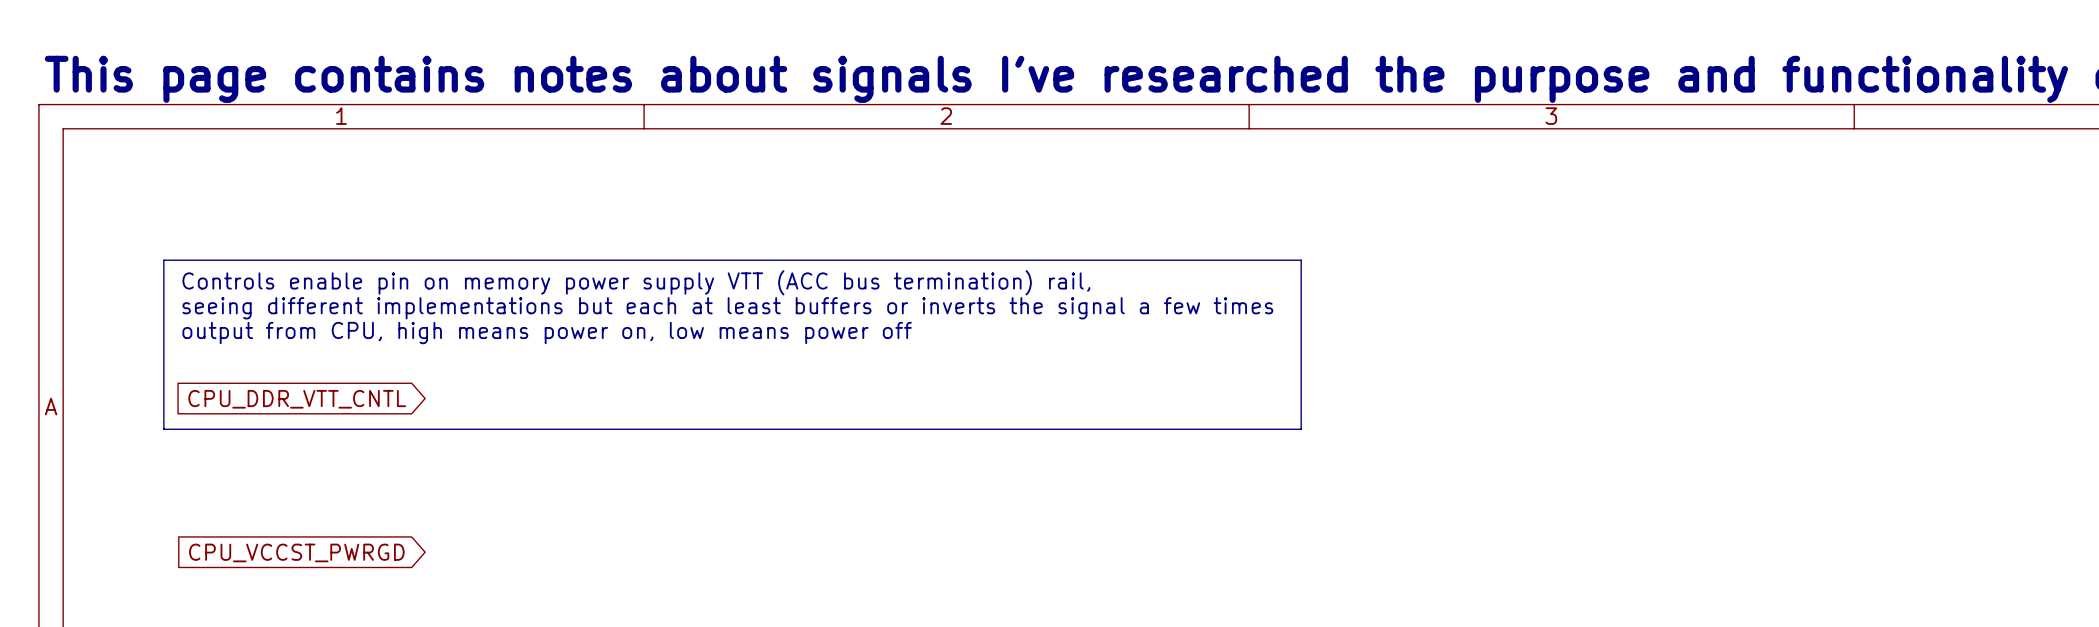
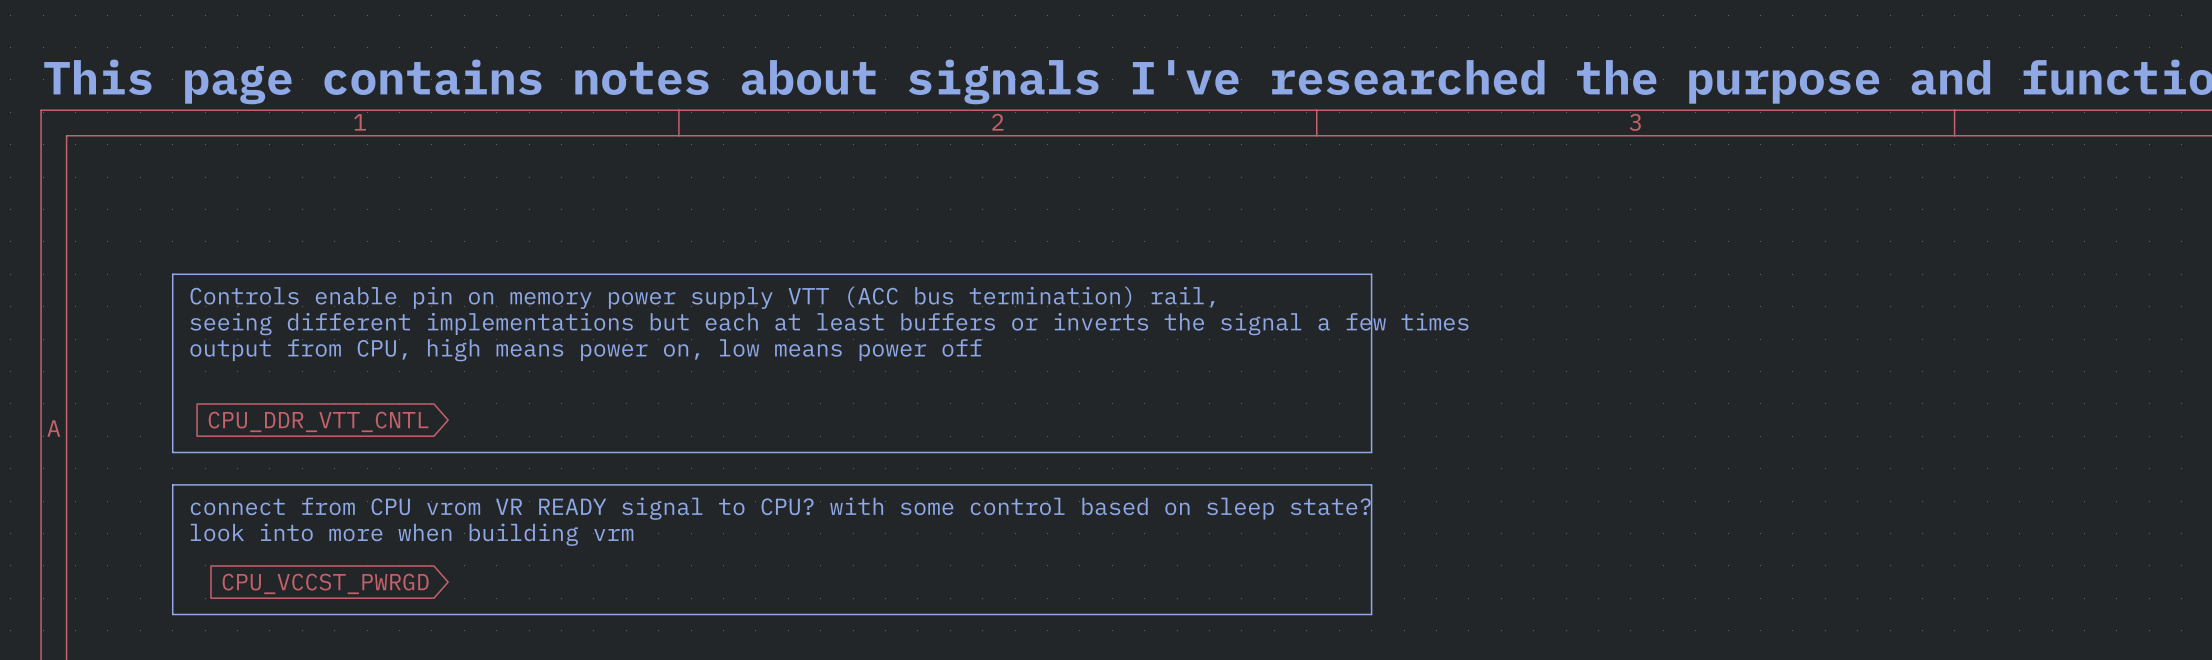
line: none -> (172, 484) (1371, 484) (1371, 614) (172, 614) (172, 484)
text: none -> connect from CPU vrom VR READY signal to CPU? with some control based on sleep state? (780, 508)
text: none -> look into more when building vrm (412, 534)

